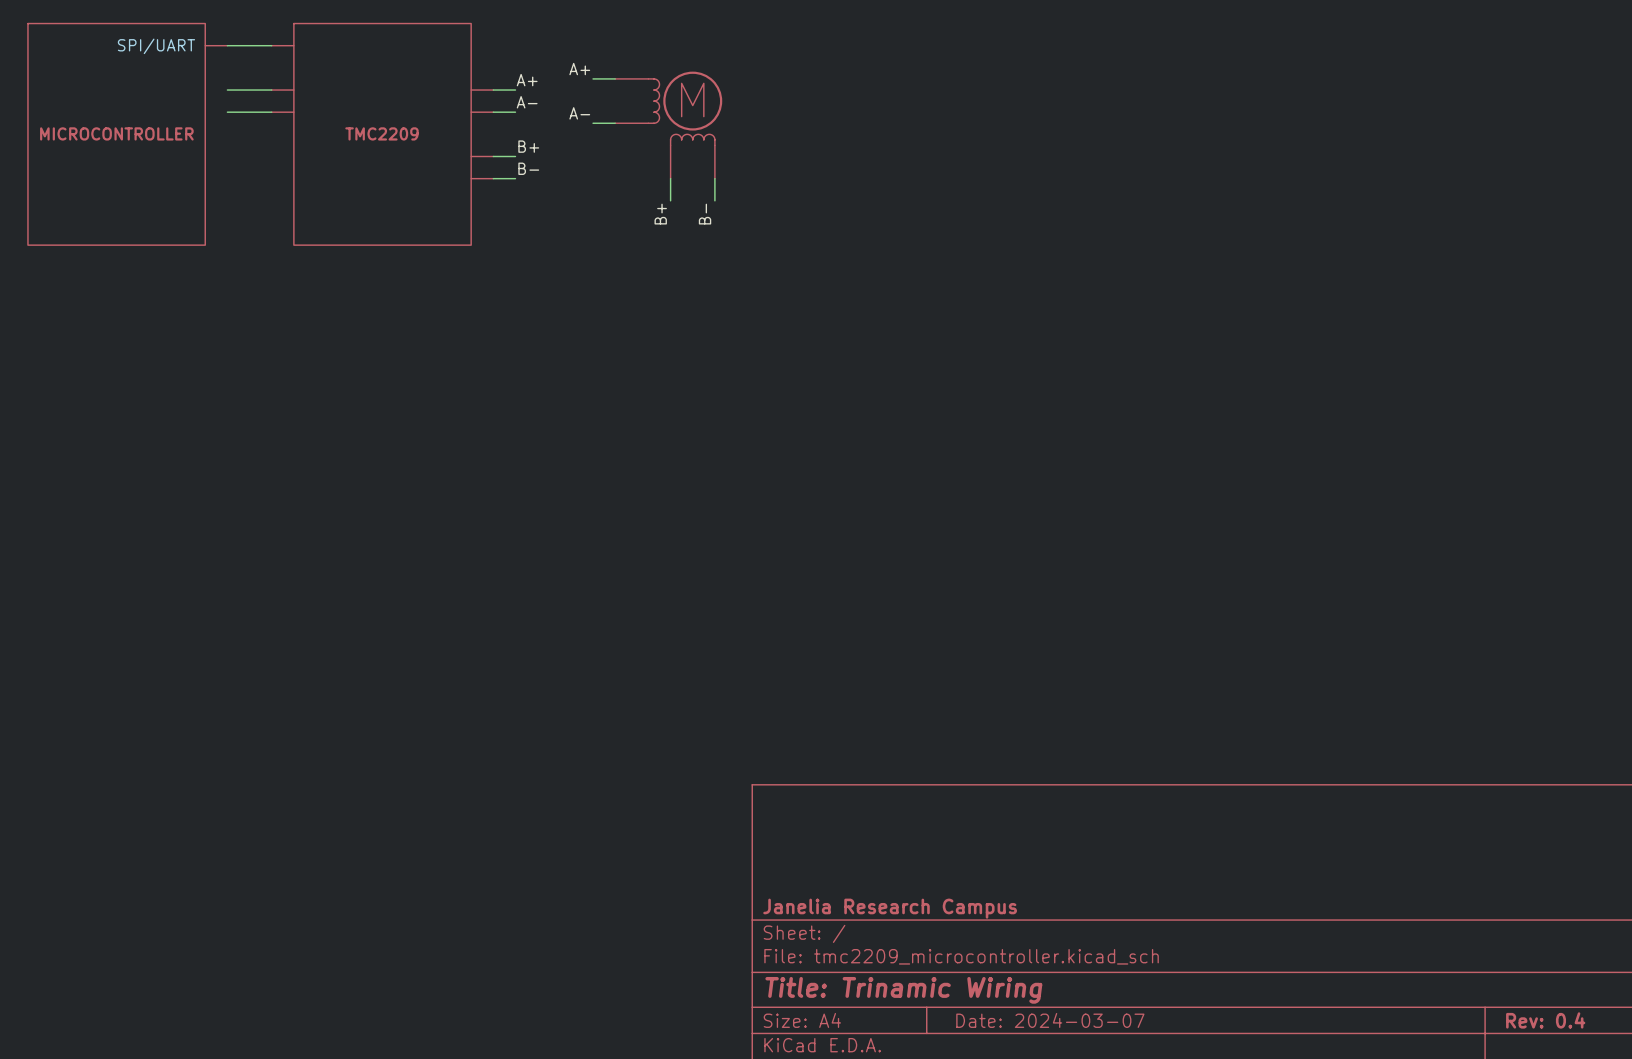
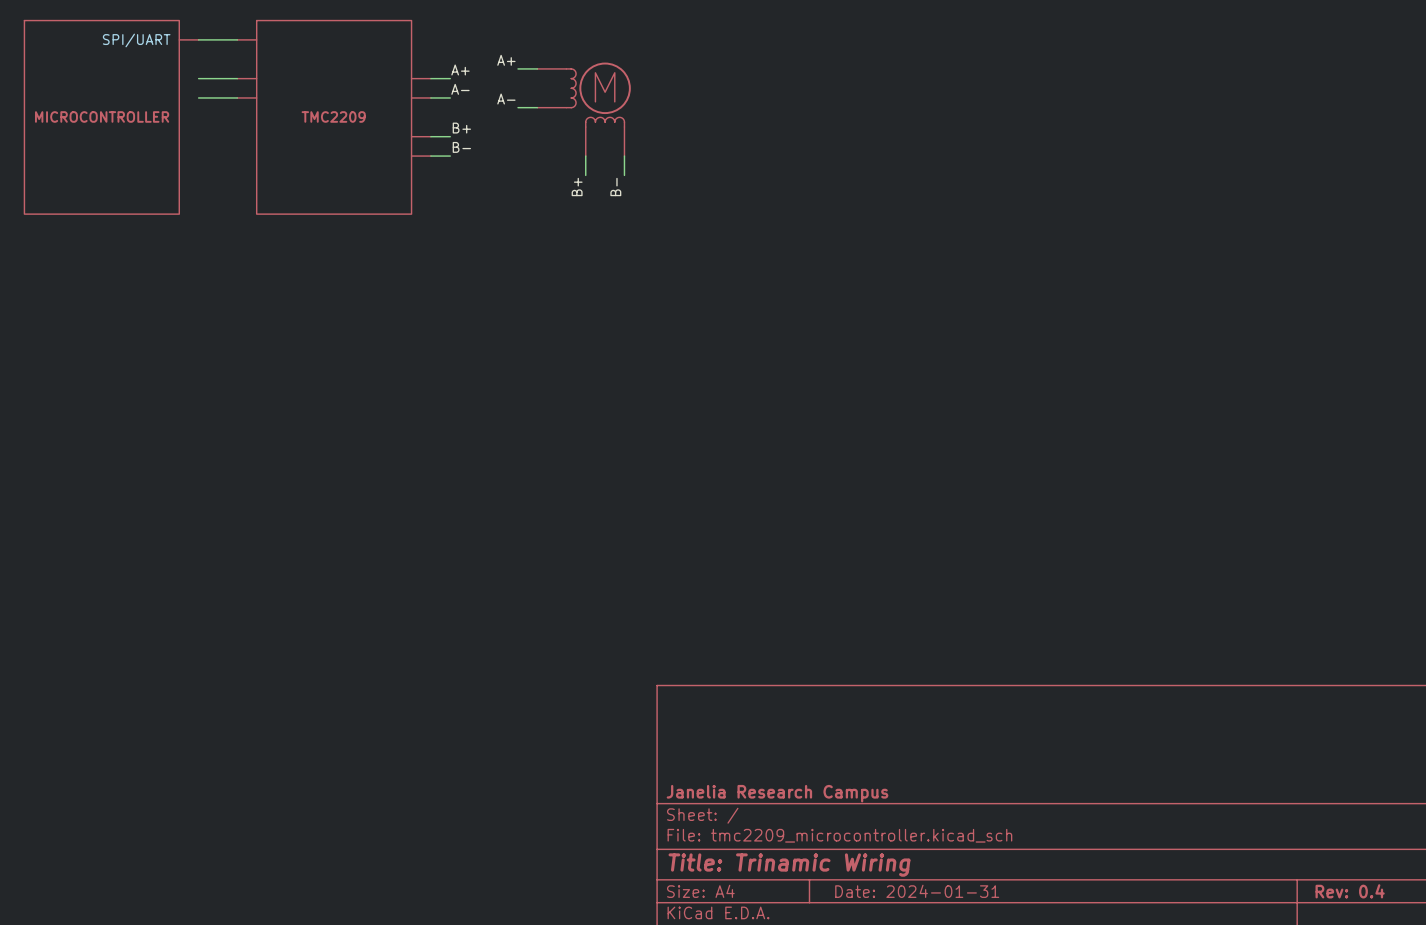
title block: Date: 2024-03-07 (1050, 1020) -> Date: 2024-01-31 (917, 891)

